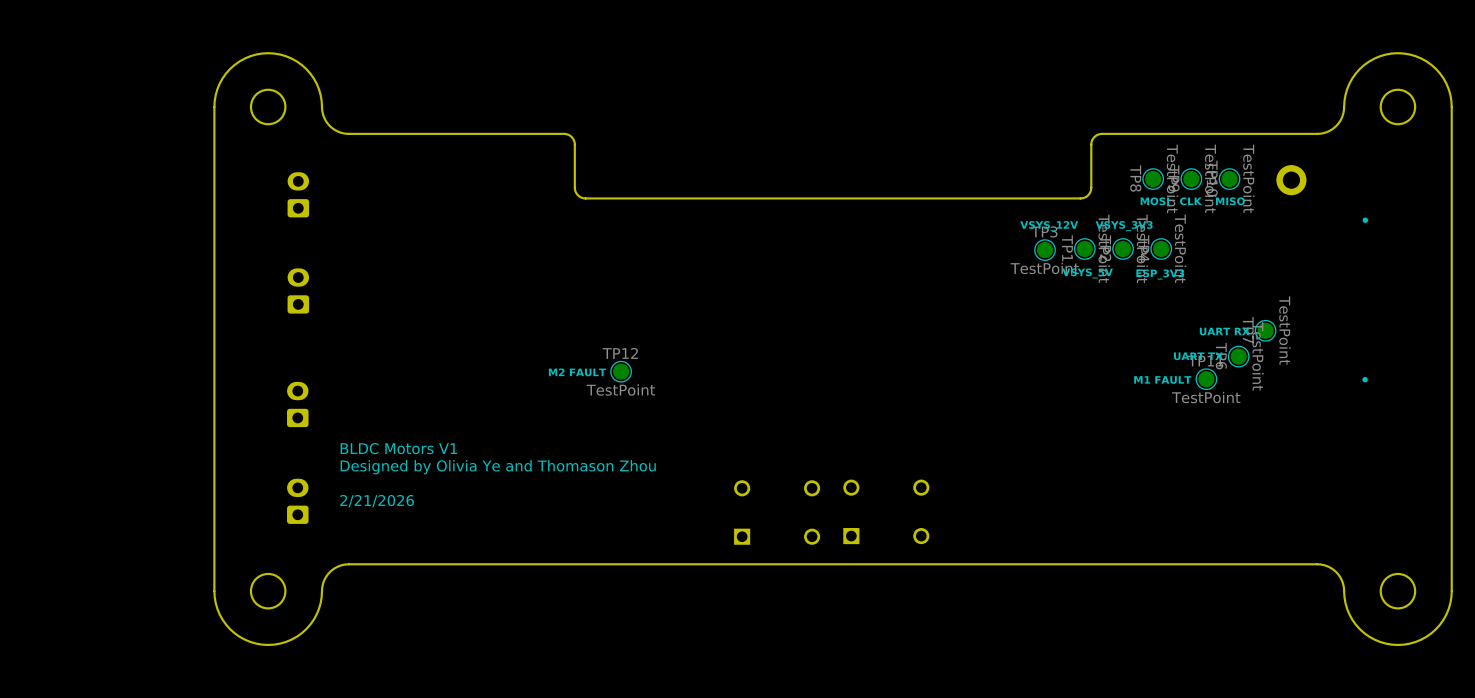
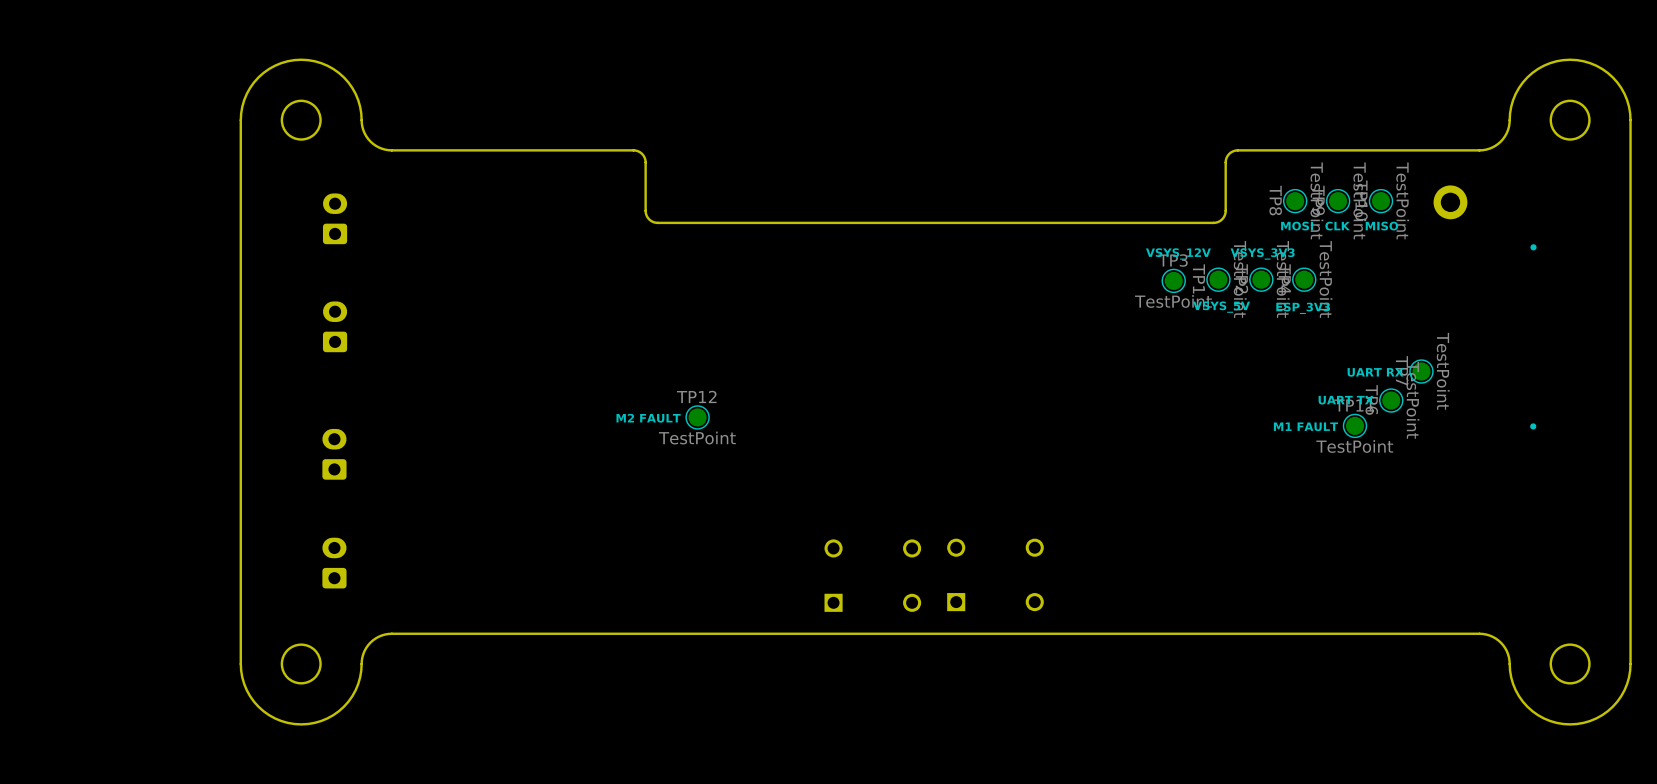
text: BLDC Motors V1 (398, 448) -> none
text: Designed by Olivia Ye and Thomason Zhou (498, 467) -> none
text: 2/21/2026 (377, 501) -> none

